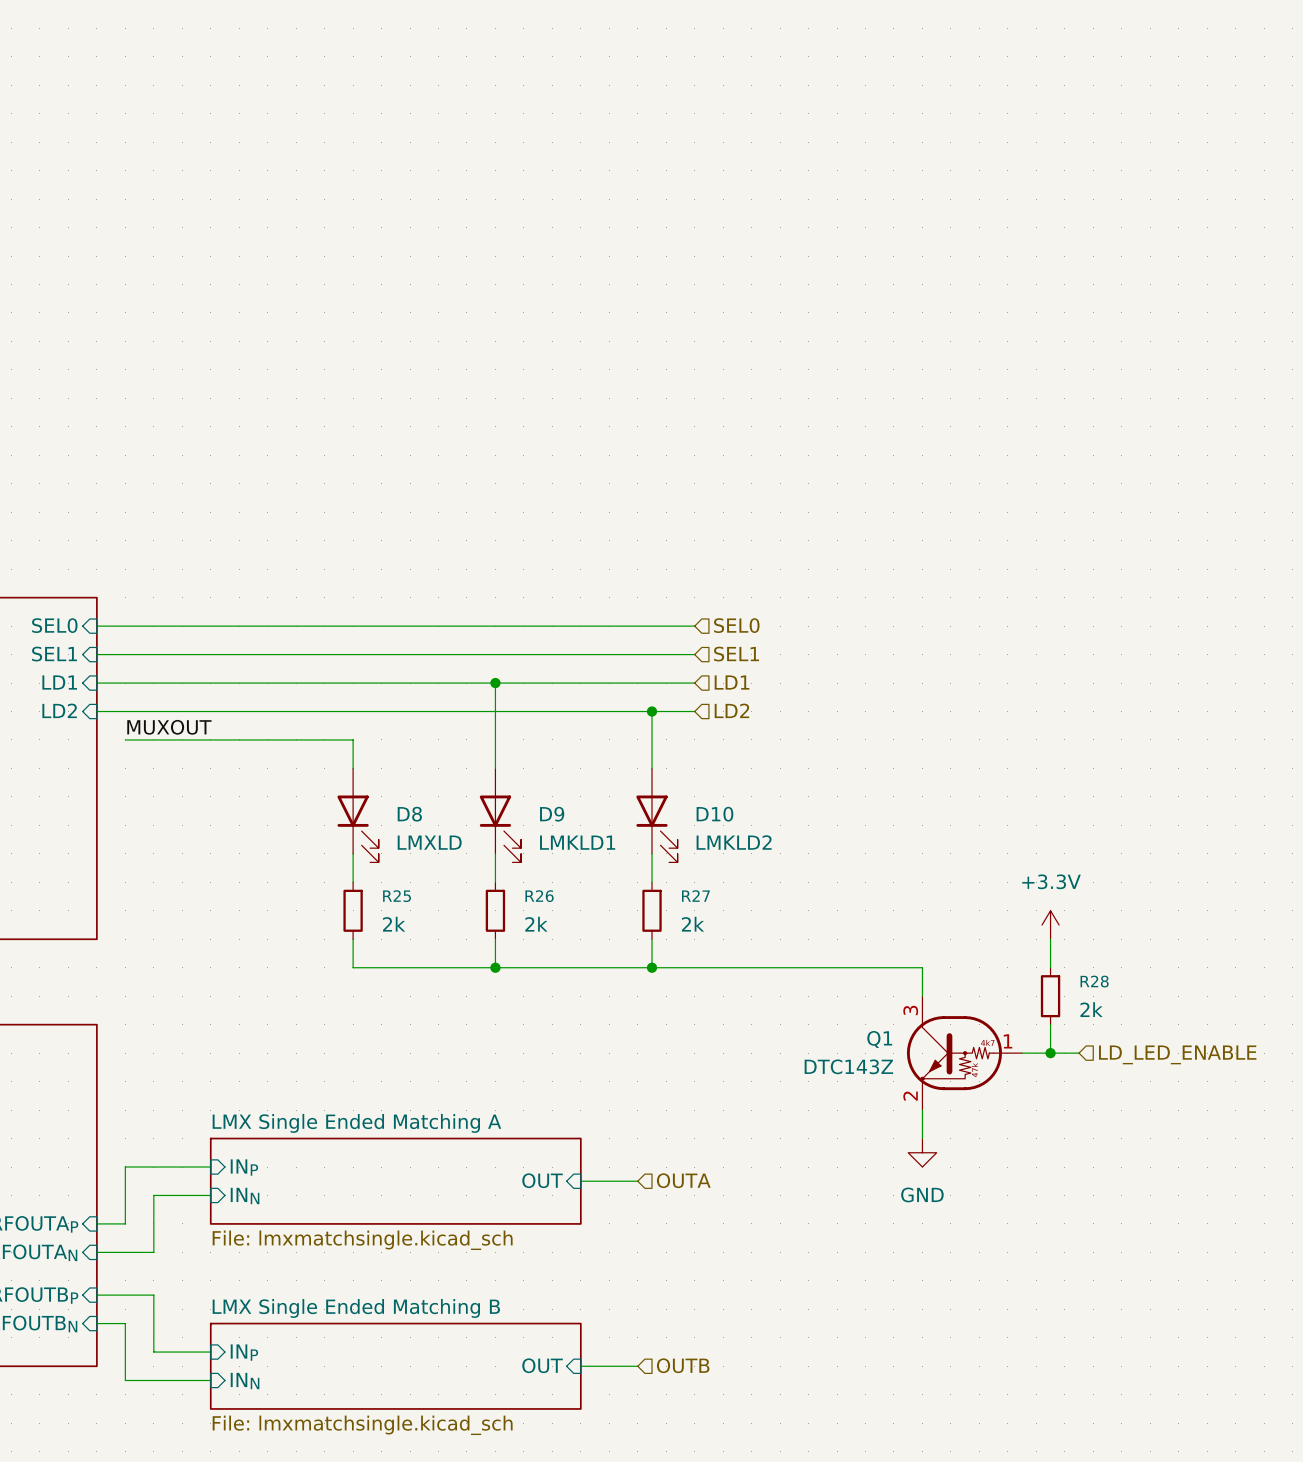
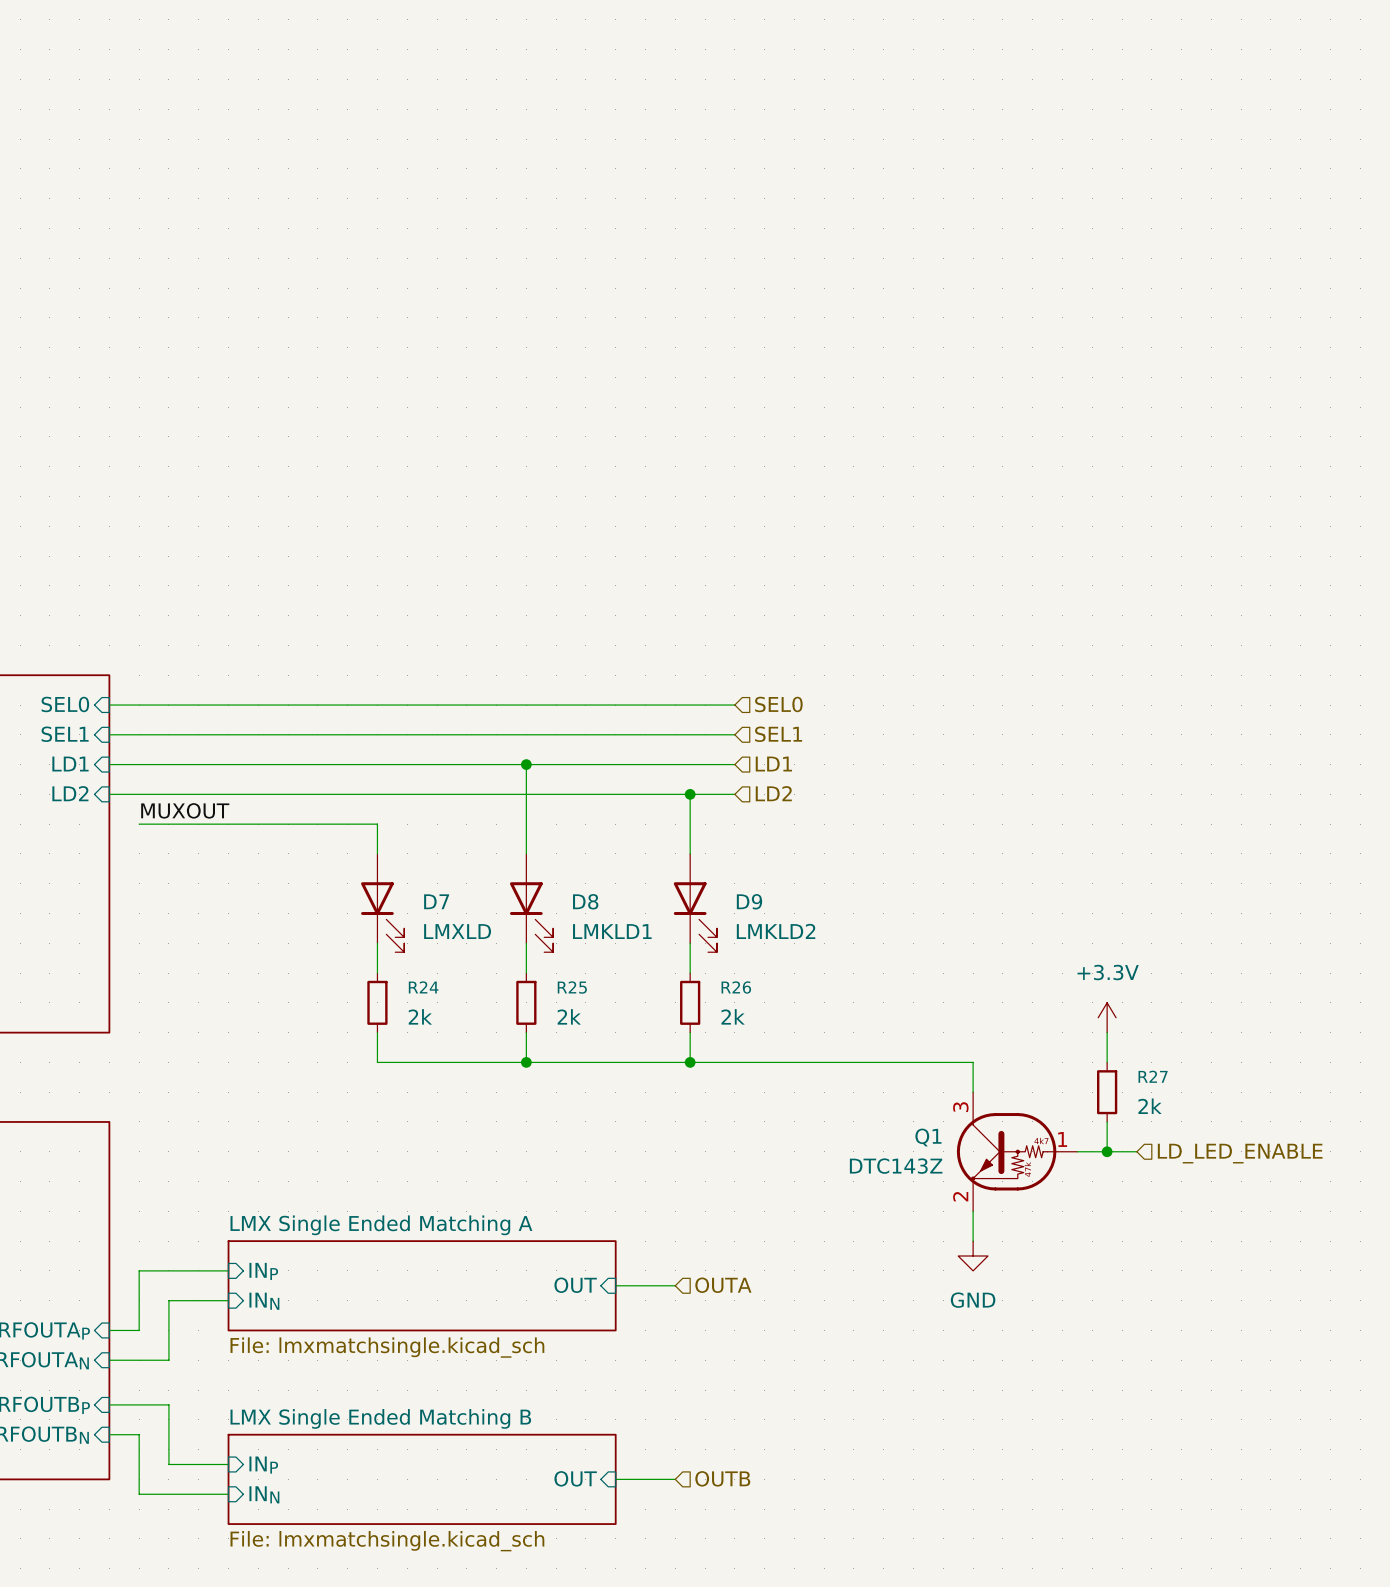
D8 name: D8 (409, 814) -> D7 (436, 901)
D9 name: D9 (552, 814) -> D8 (585, 901)
D10 name: D10 (714, 814) -> D9 (749, 901)
R25 name: R25 (397, 896) -> R24 (423, 987)
R26 name: R26 (539, 896) -> R25 (572, 987)
R27 name: R27 (695, 896) -> R26 (736, 987)
R28 name: R28 (1094, 981) -> R27 (1153, 1076)

